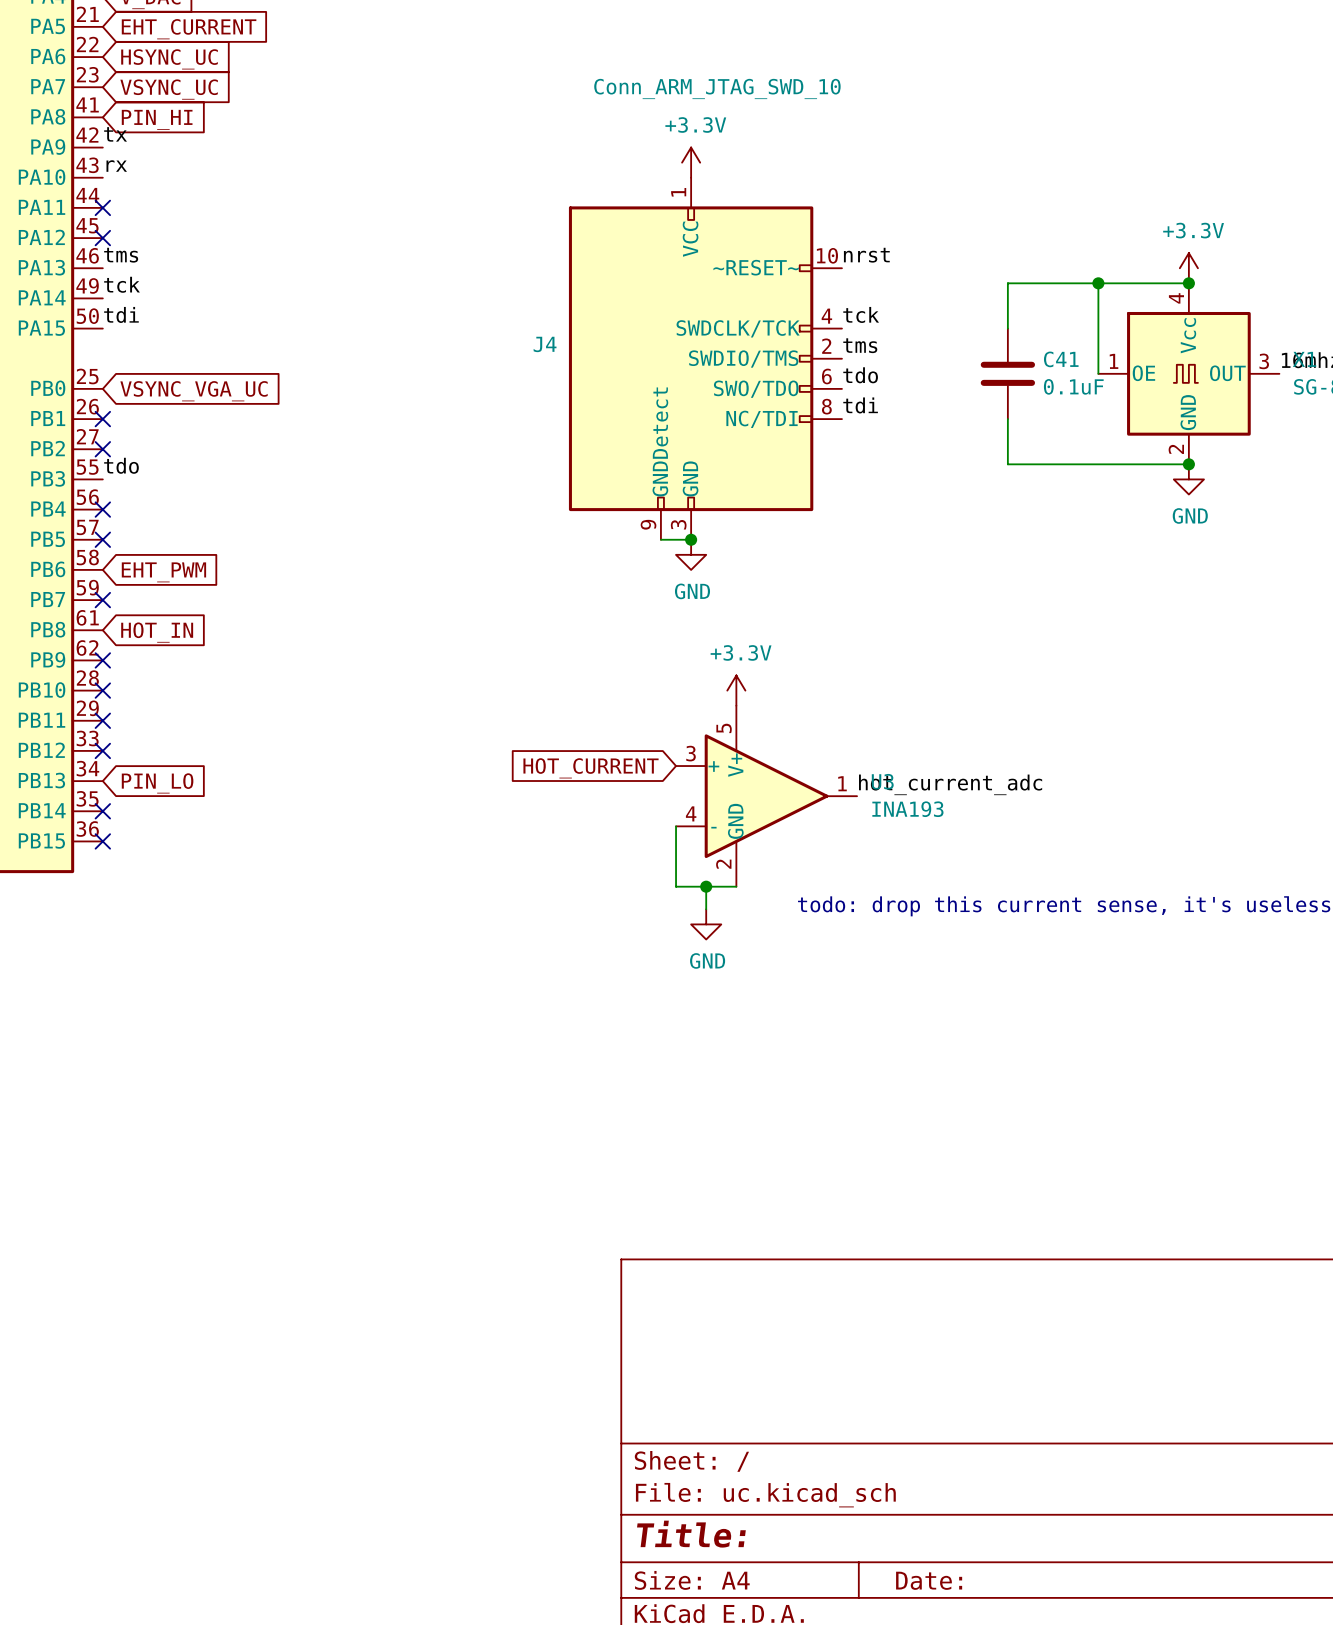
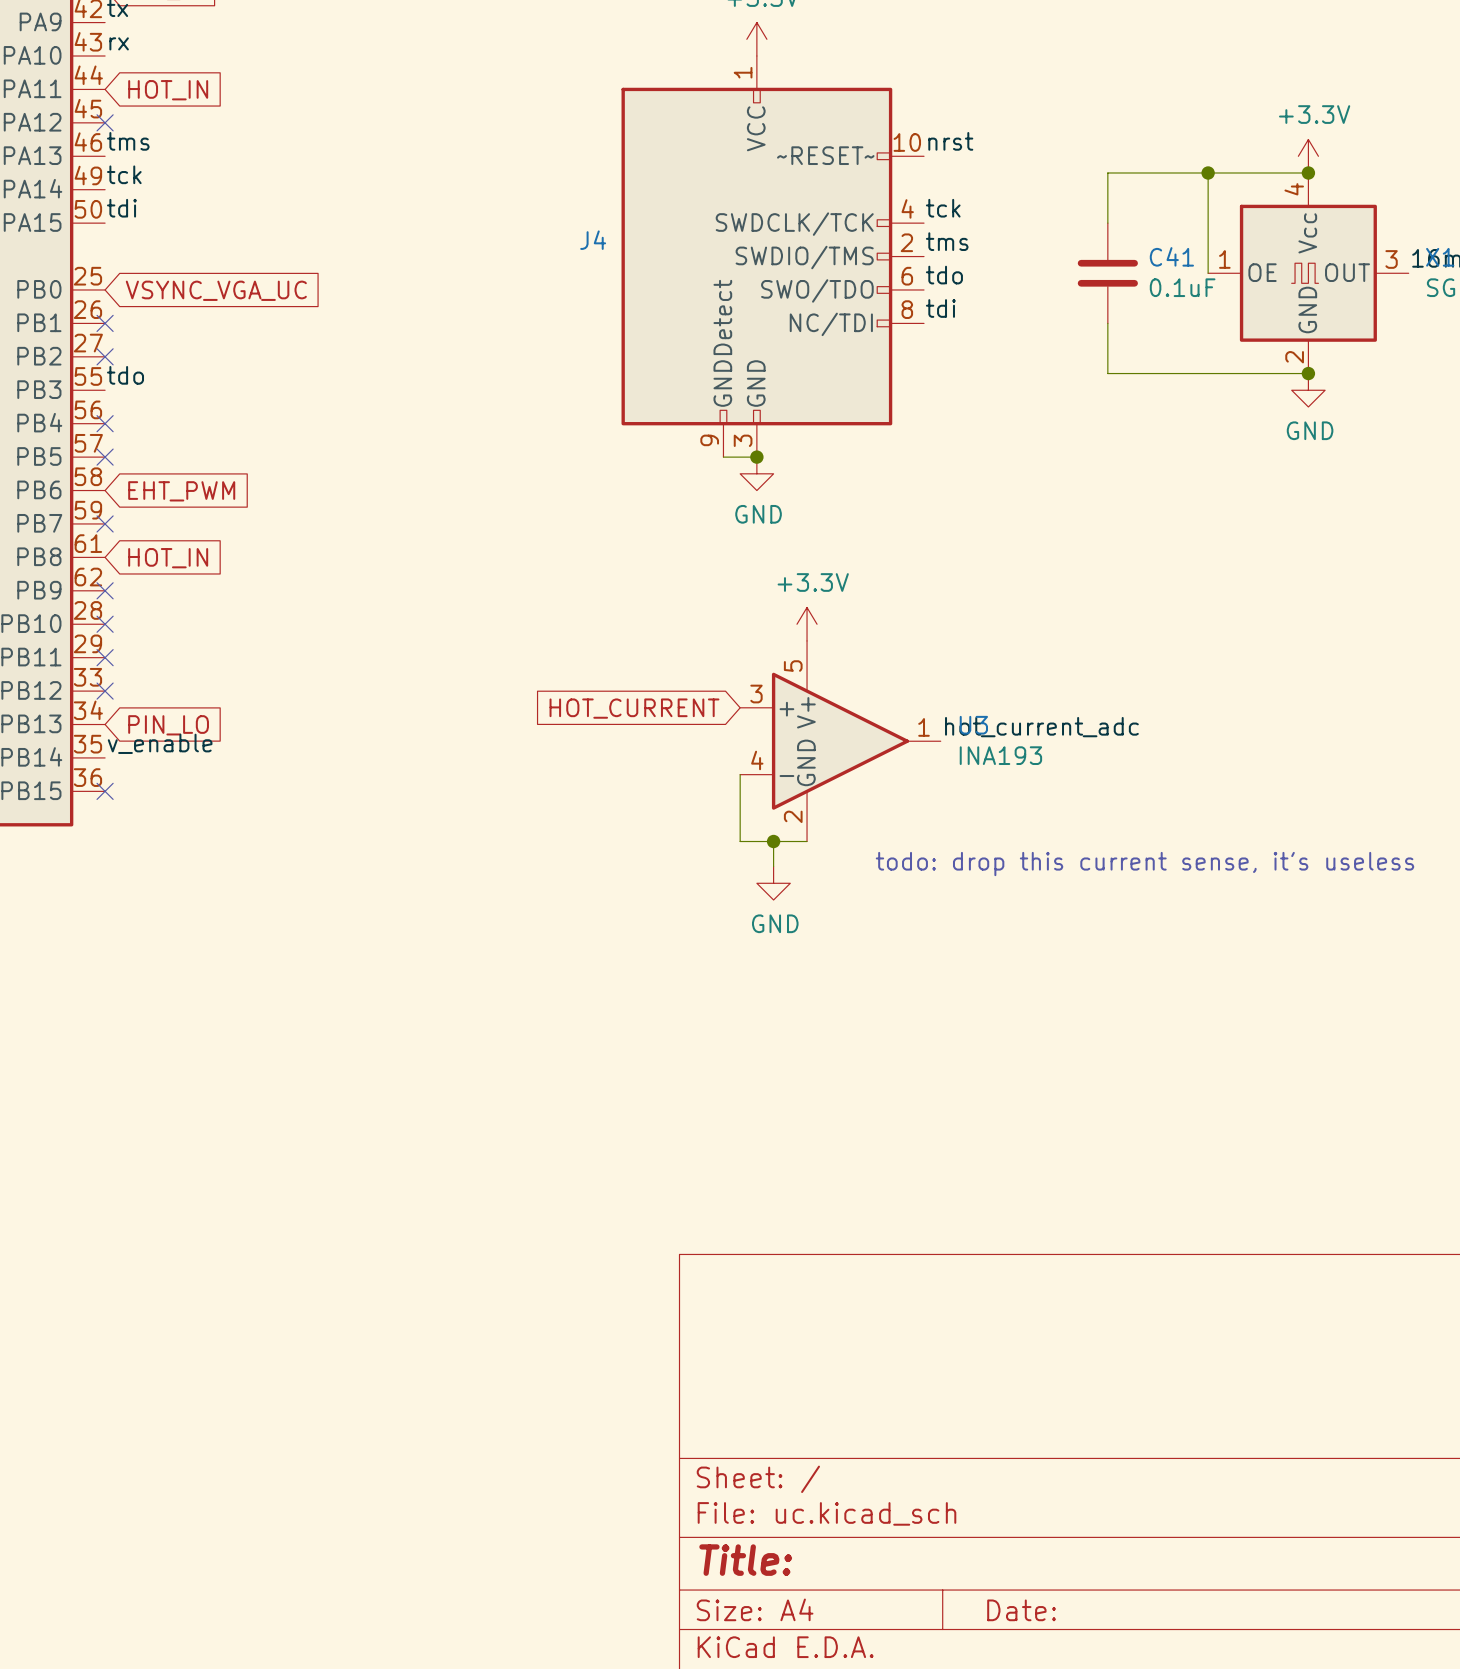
no-connect mark: (102, 207) -> none
global label: none -> HOT_IN (168, 90)
label: none -> v_enable (160, 743)
no-connect mark: (102, 811) -> none

